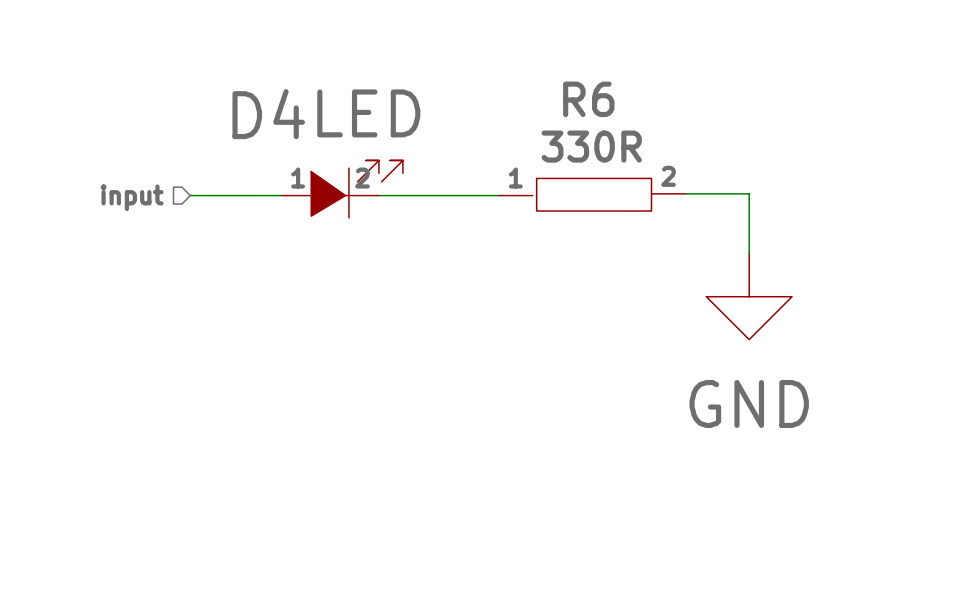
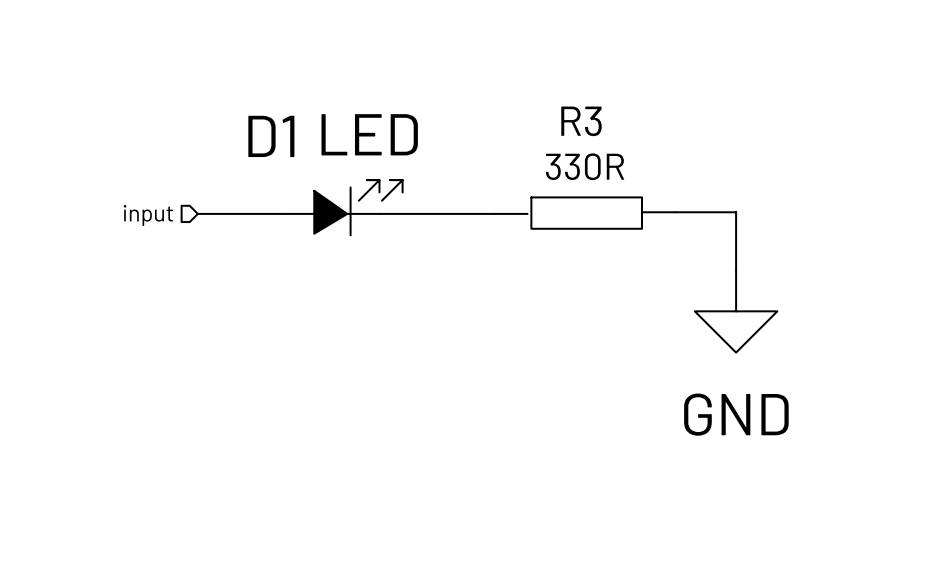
R6 name: R6 (588, 99) -> R3 (581, 121)
D4 name: D4 (268, 114) -> D1 (271, 136)
R6 pin number: 2 (668, 176) -> none
D4 pin number: 1 (298, 178) -> none
D4 pin number: 2 (362, 178) -> none
R6 pin number: 1 (515, 178) -> none

